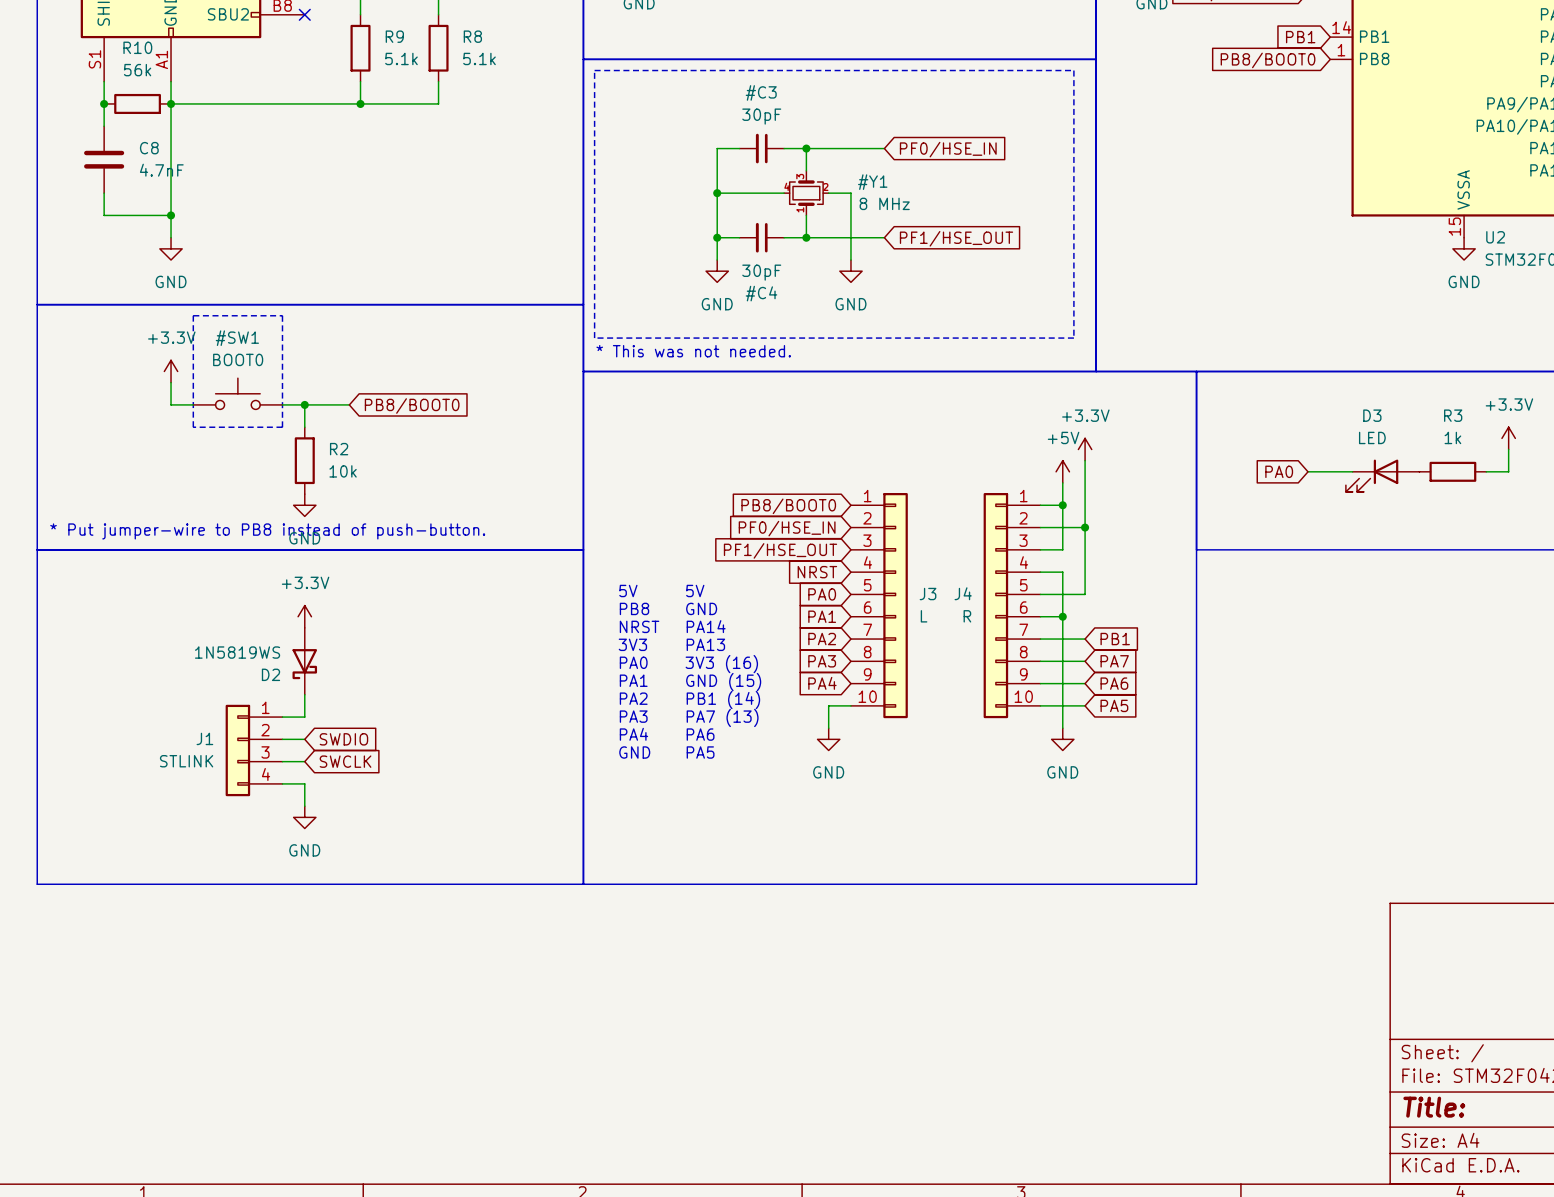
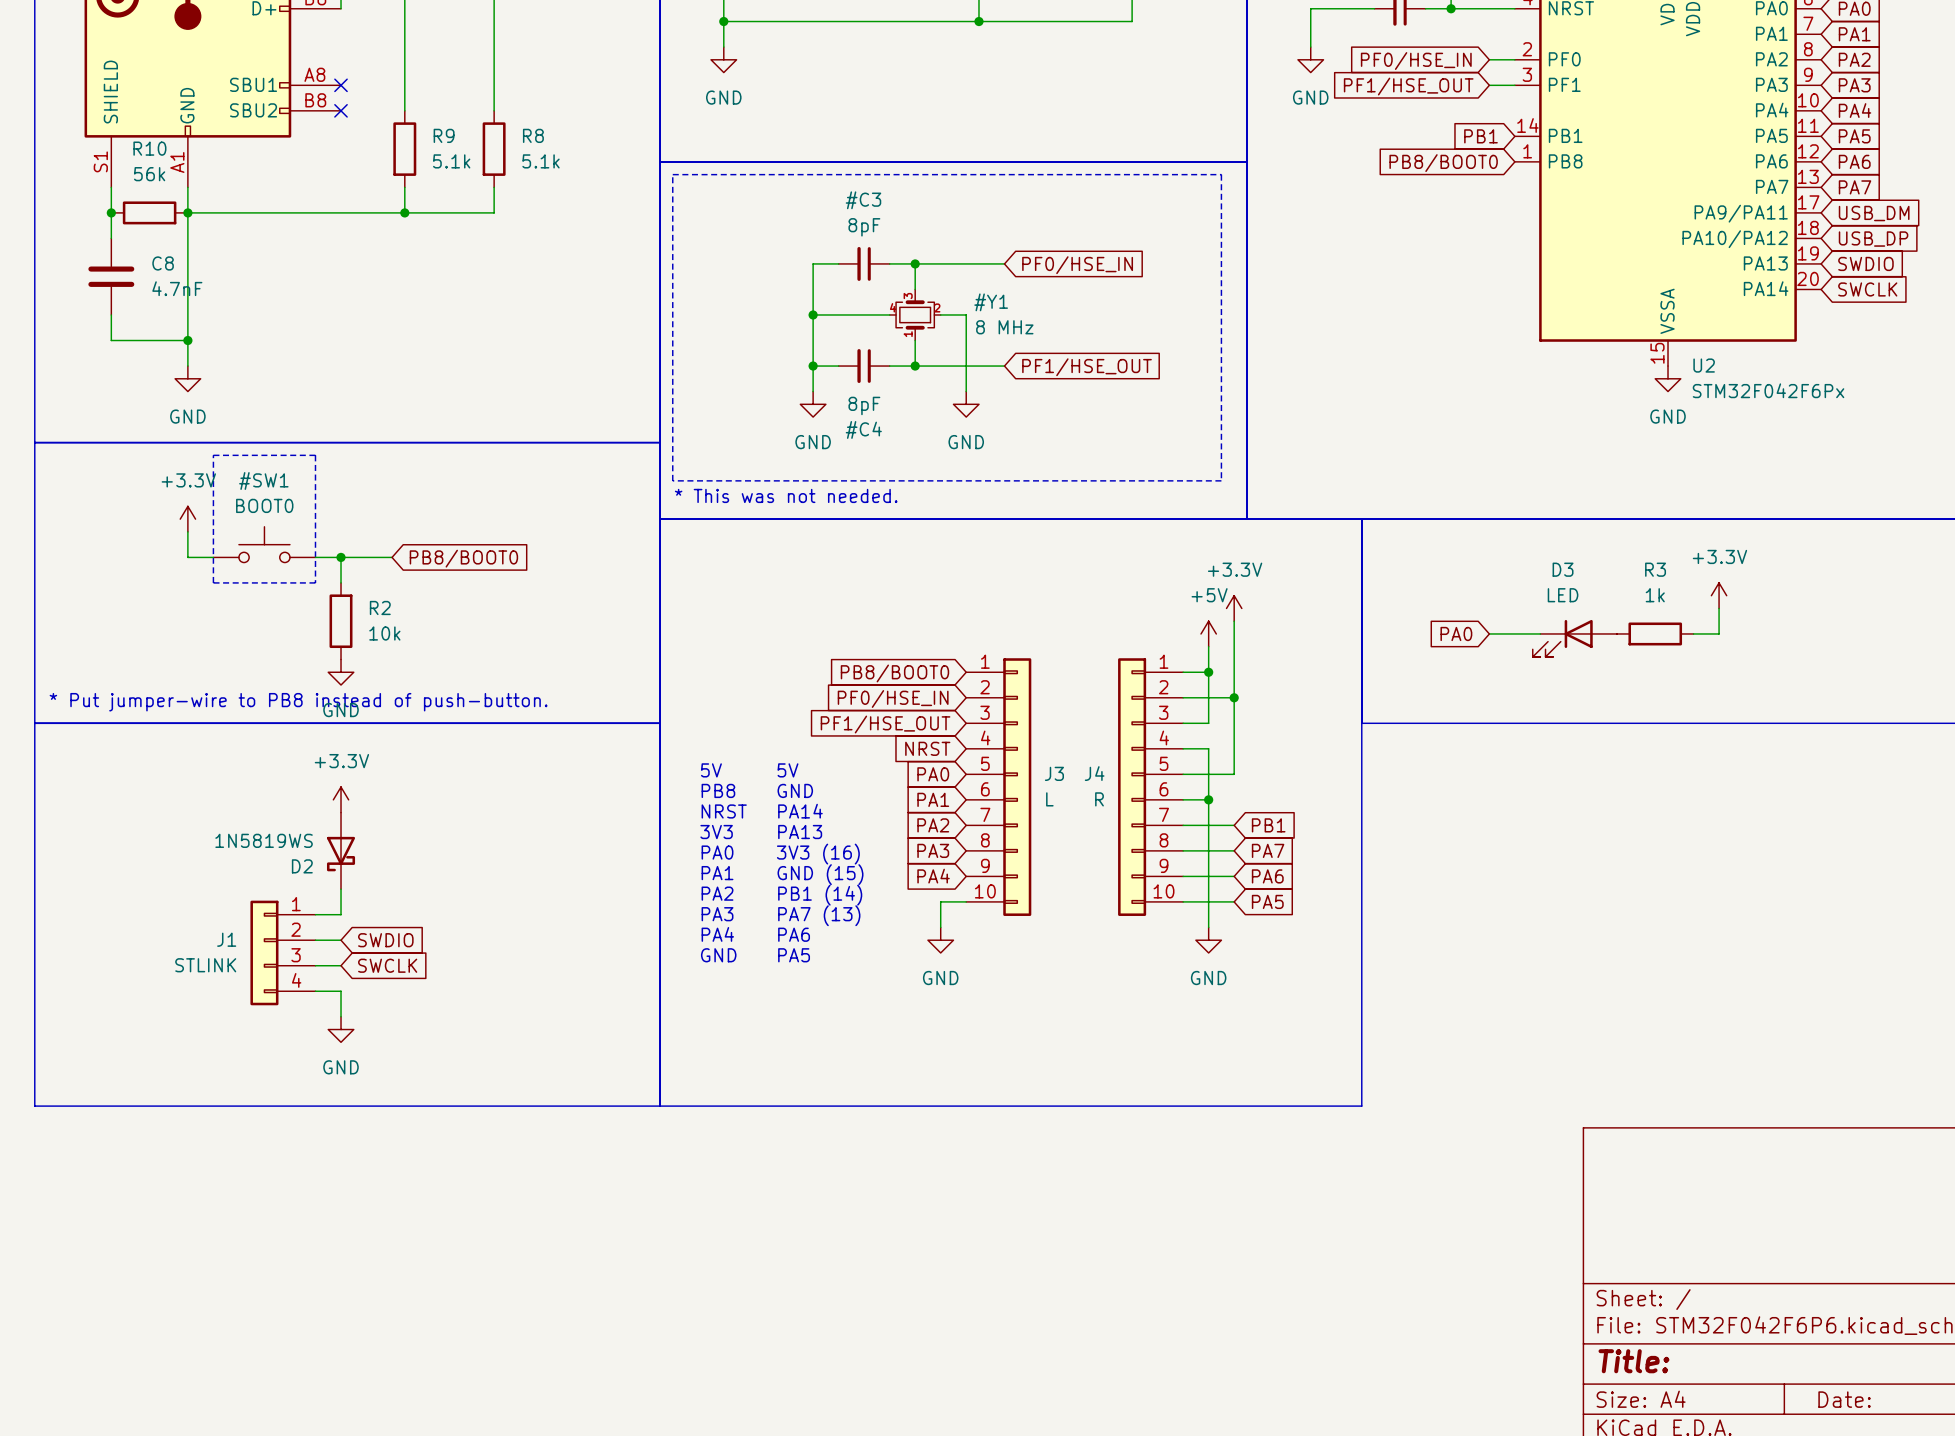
power symbol: 30pF (761, 148) -> 8pF (864, 263)
power symbol: 30pF (761, 237) -> 8pF (864, 366)

